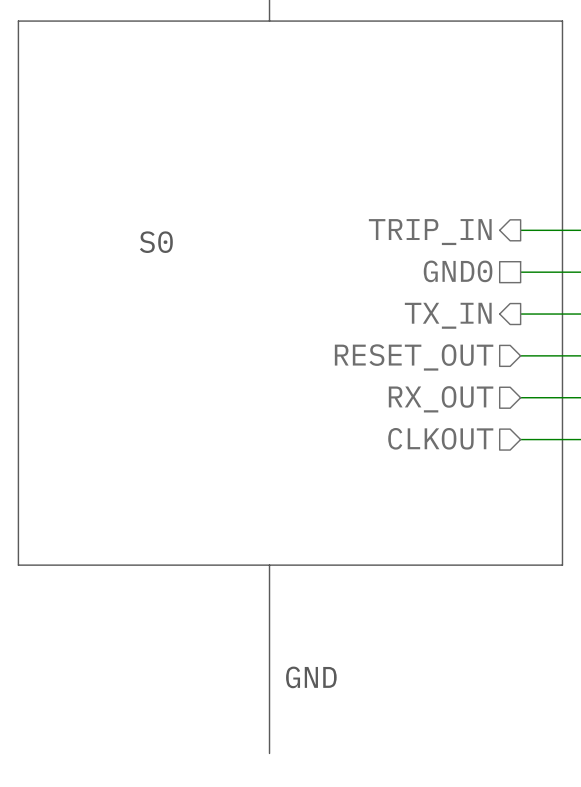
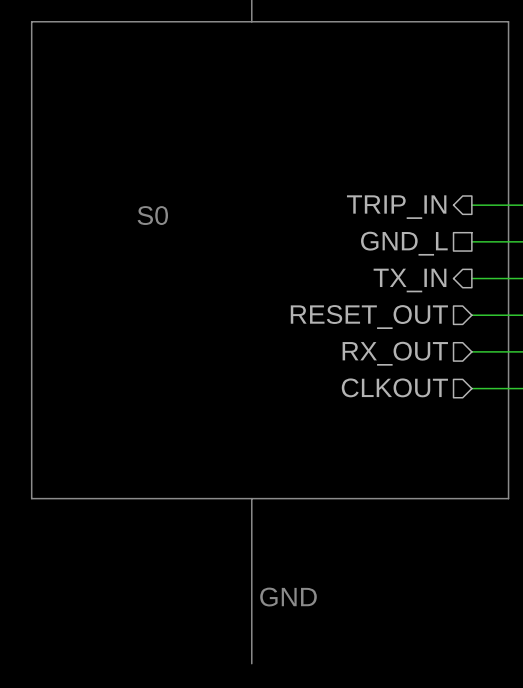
hierarchical label: GND0 (458, 271) -> GND_L (404, 243)

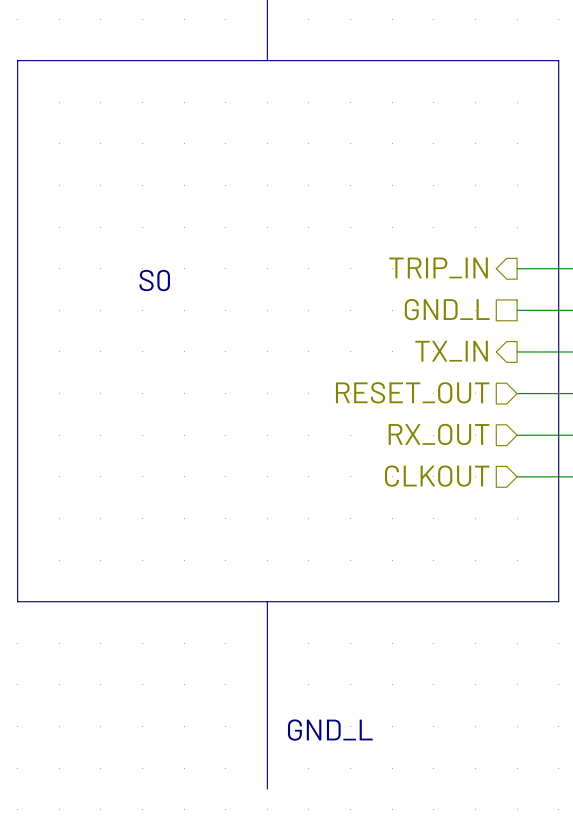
text: GND (288, 597) -> GND_L (330, 730)

